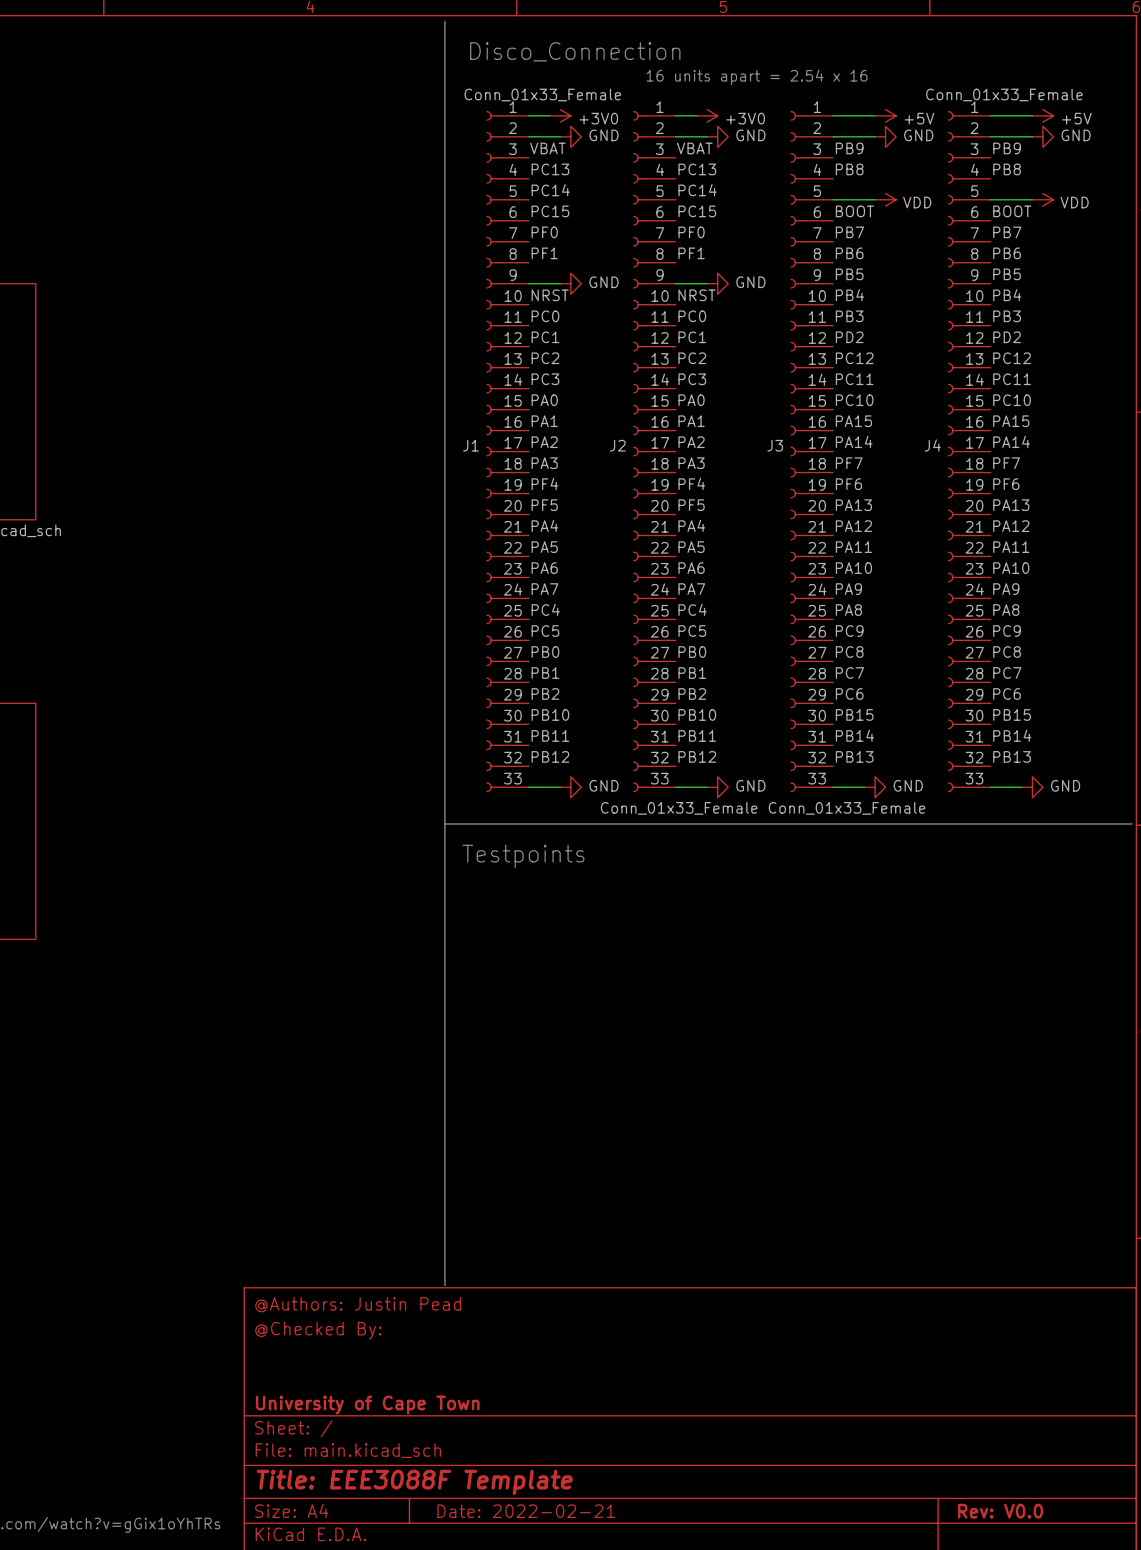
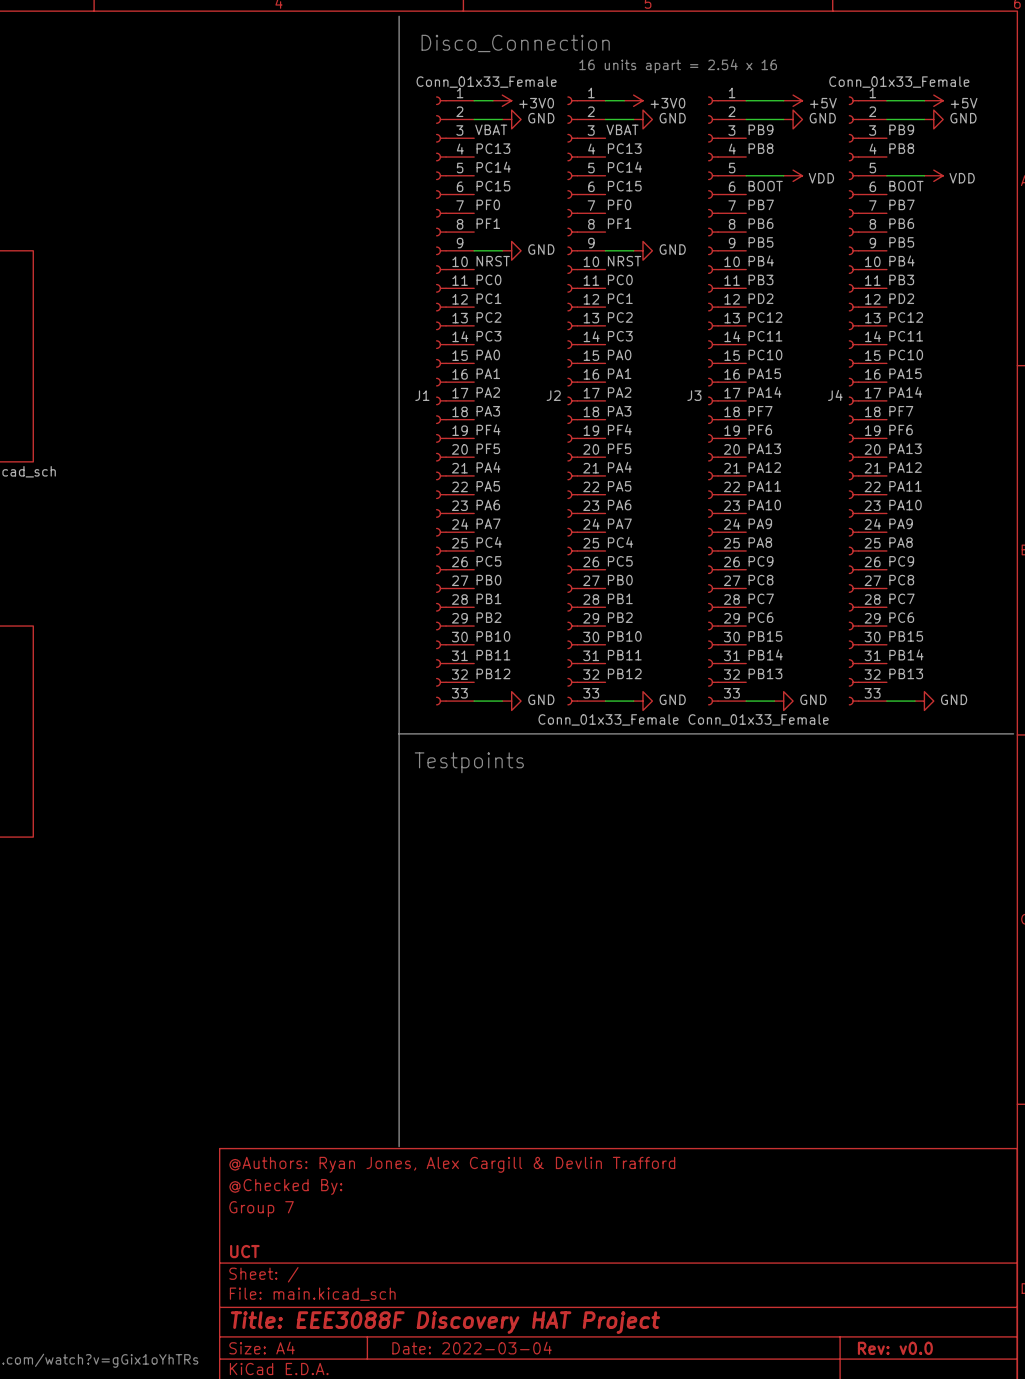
title block: @Authors: Justin Pead (358, 1304) -> @Authors: Ryan Jones, Alex Cargill & Devlin Trafford (452, 1164)
title block: none -> Group 7 (261, 1209)
title block: University of Cape Town (367, 1405) -> UCT (244, 1251)
title block: Title: EEE3088F Template (414, 1482) -> Title: EEE3088F Discovery HAT Project (445, 1322)
title block: Date: 2022-02-21 (526, 1511) -> Date: 2022-03-04 (472, 1348)
title block: Rev: V0.0 (1000, 1511) -> Rev: v0.0 (895, 1348)

